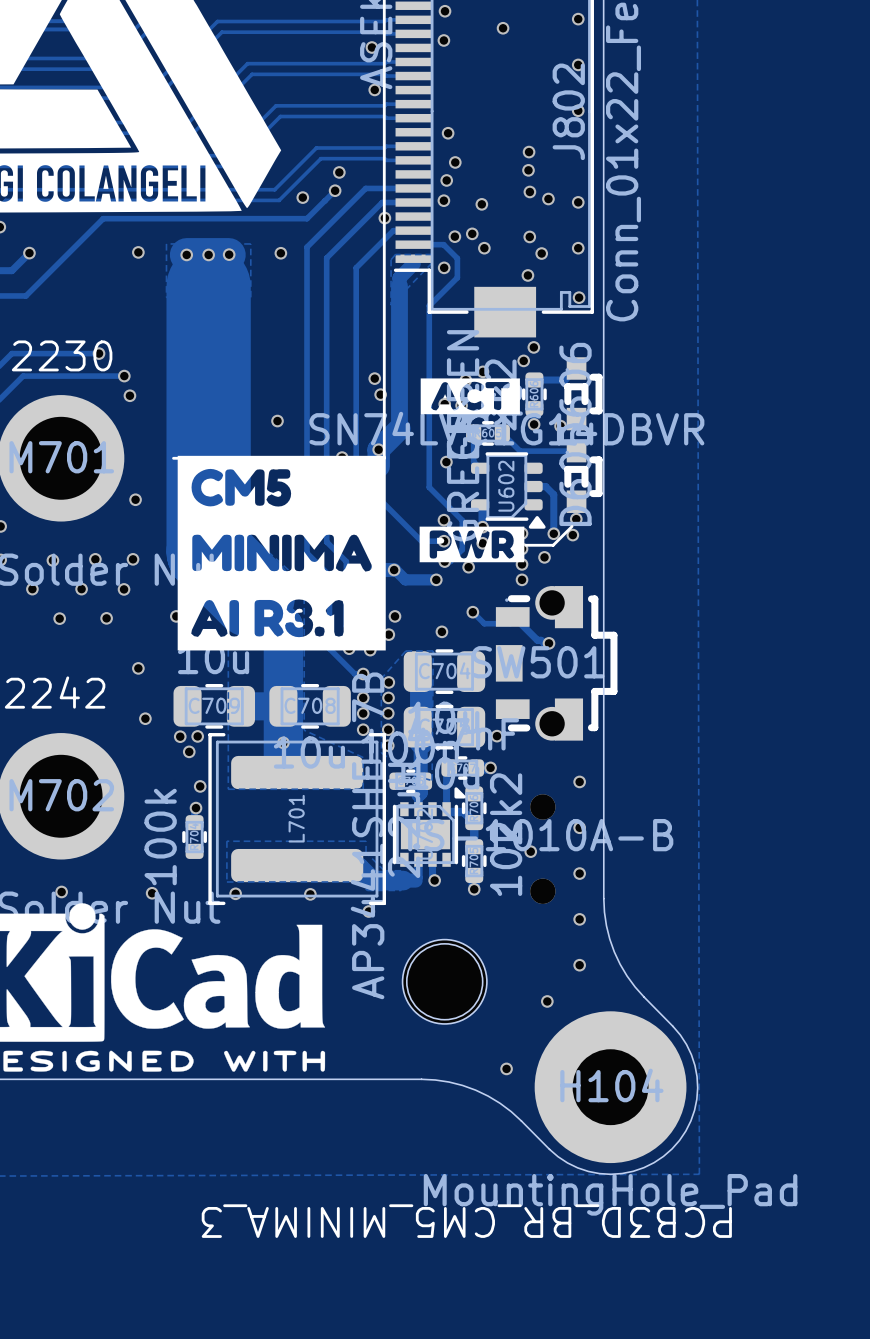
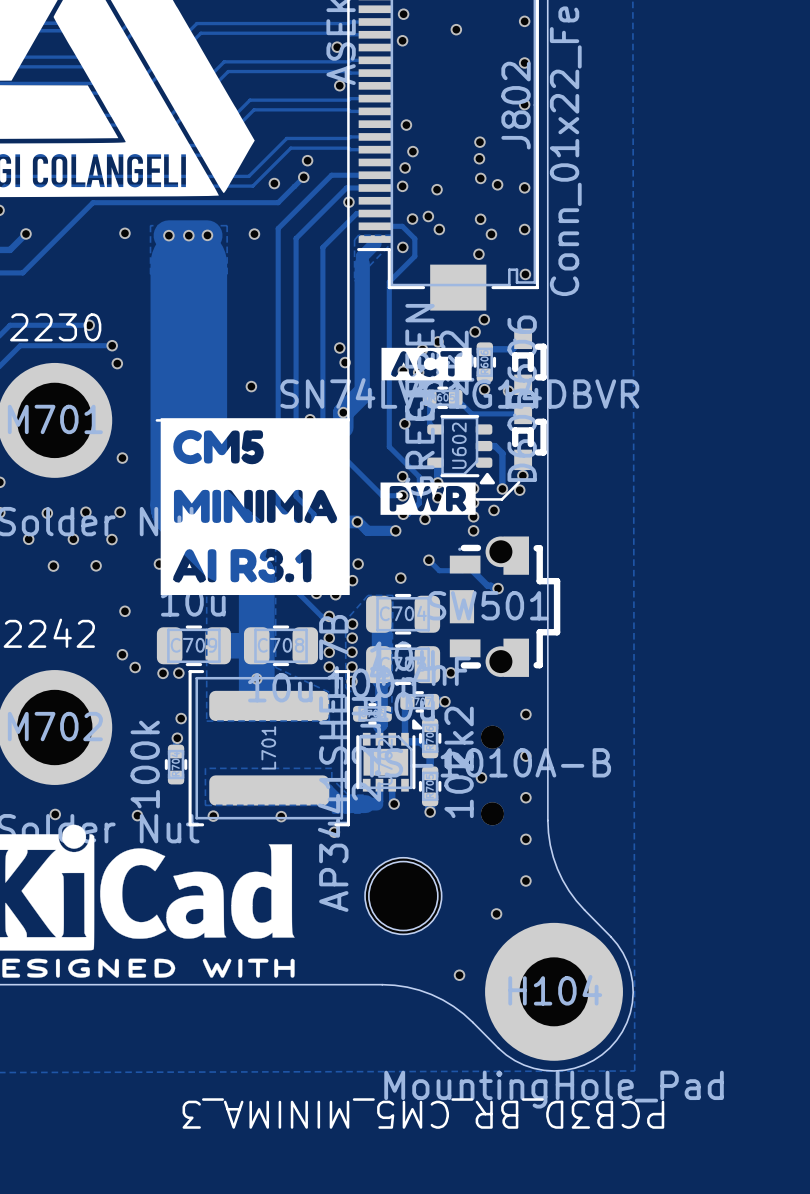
via: none -> (122, 654)
via: (145, 718) -> none
via: none -> (135, 667)
via: (189, 751) -> none

